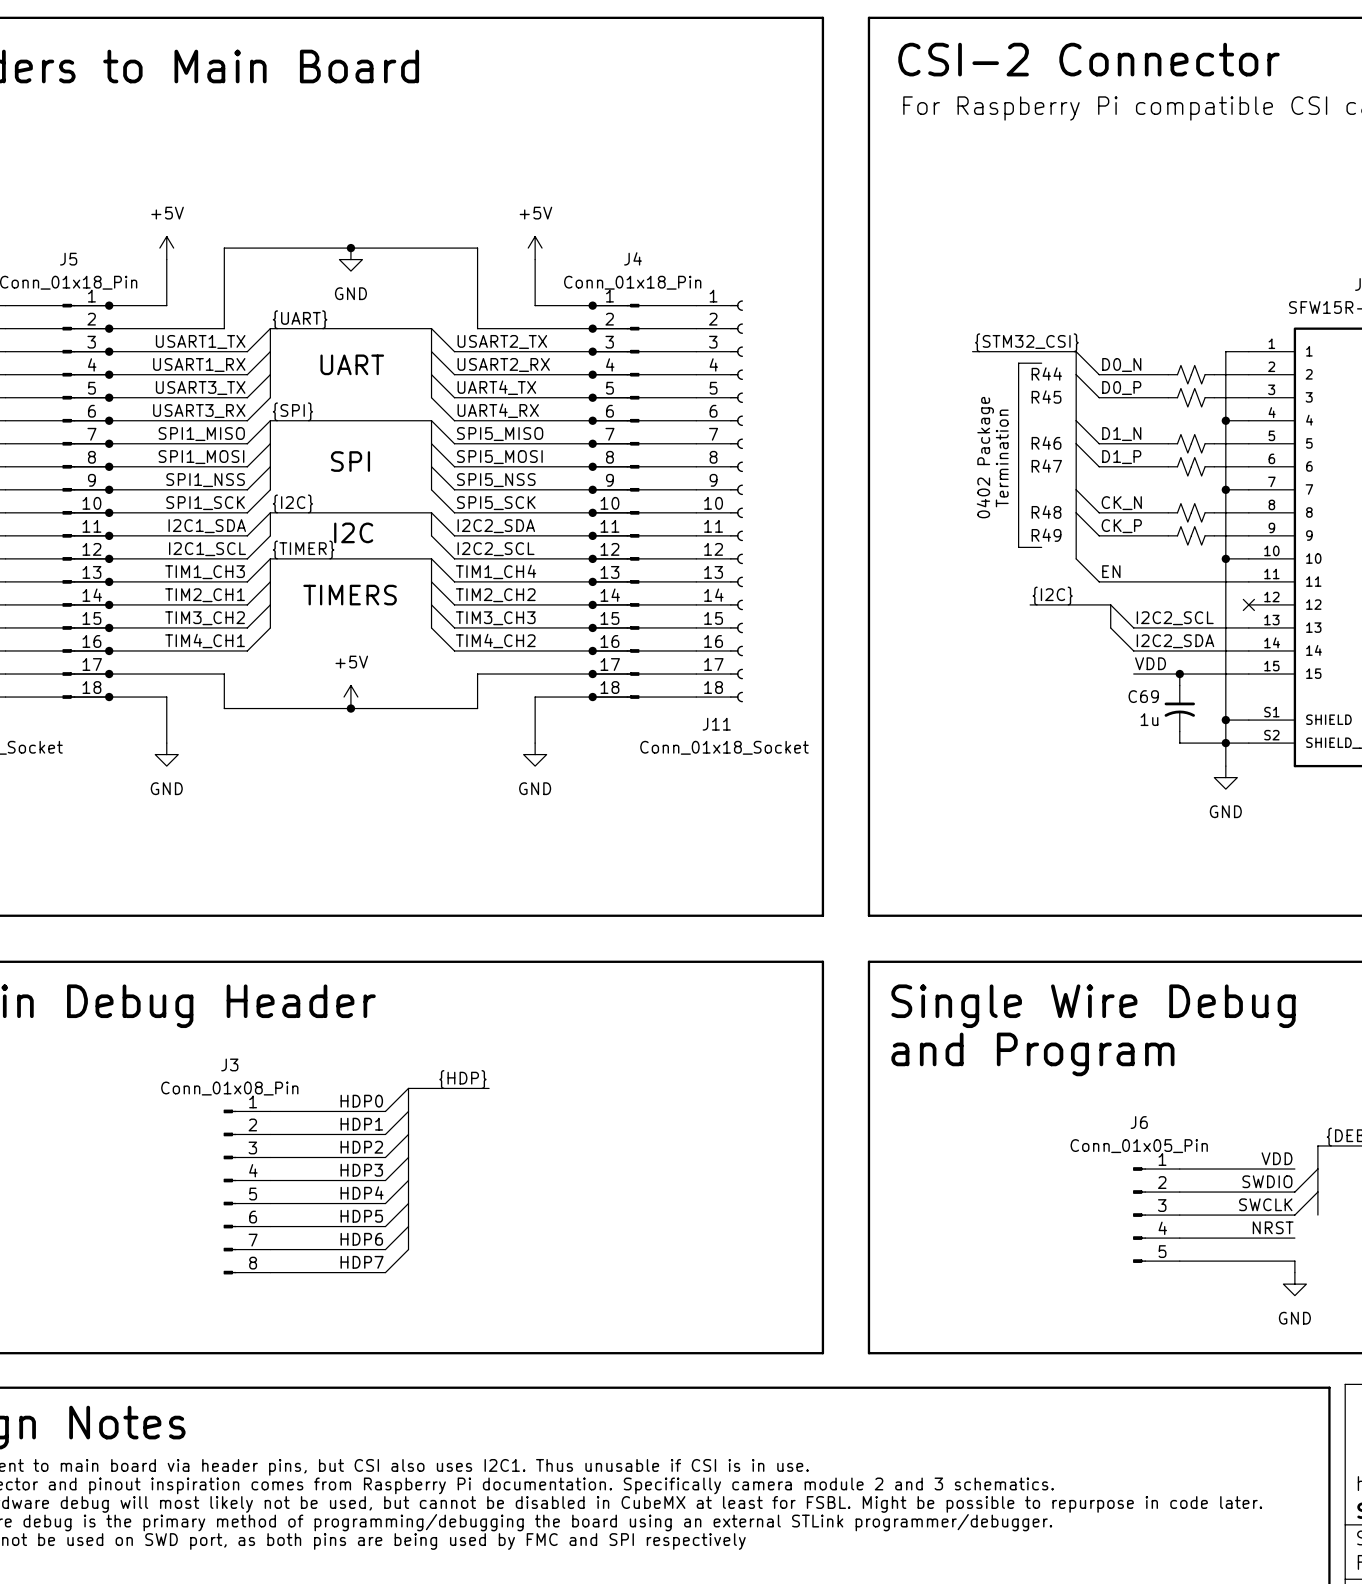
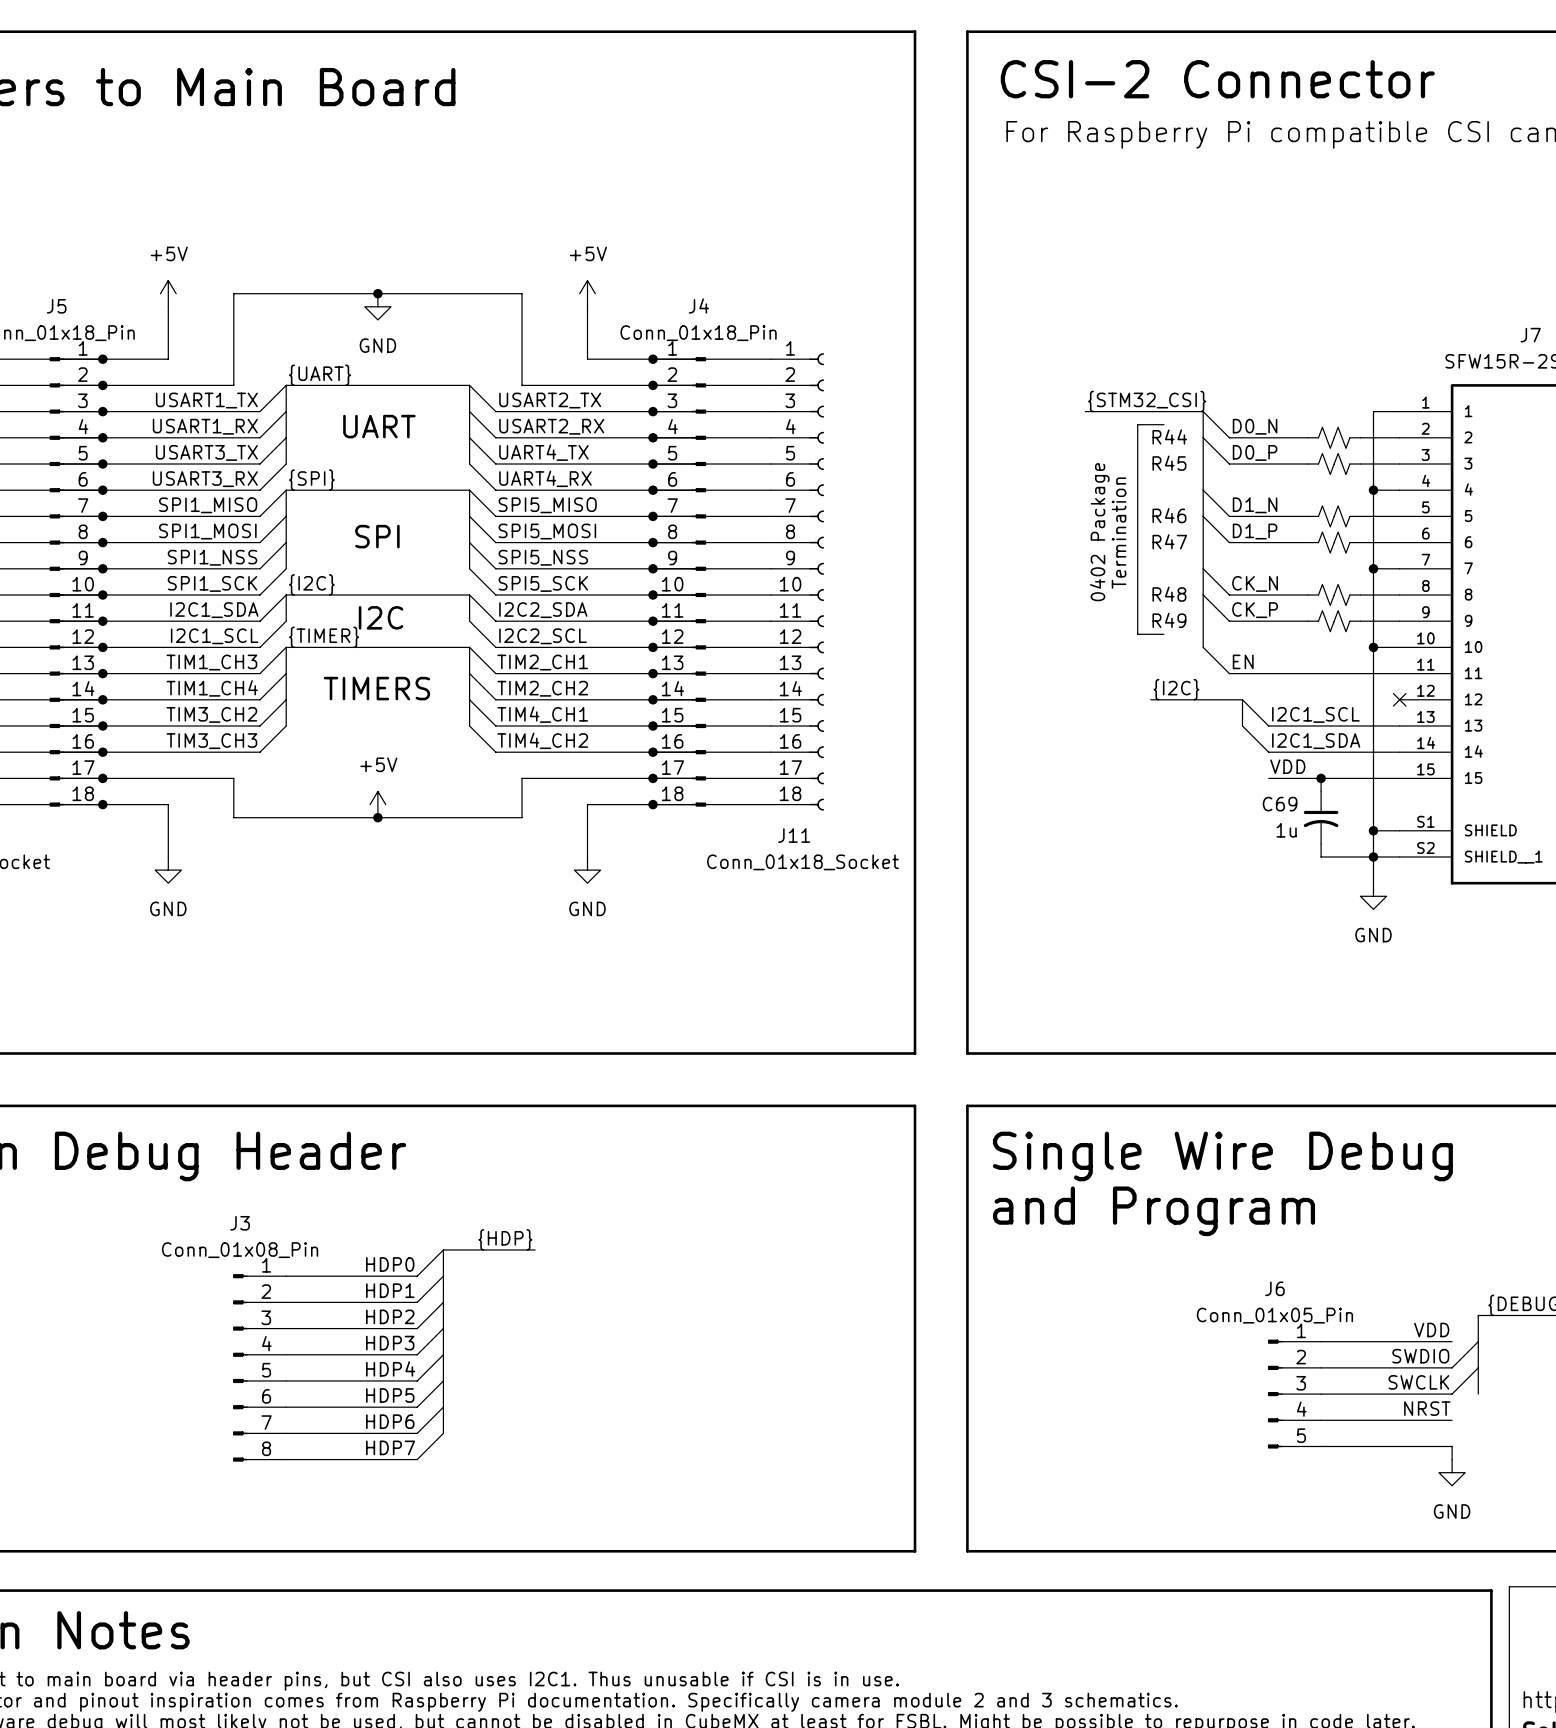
label: TIM1_CH4 (496, 571) -> TIM2_CH1 (542, 662)
label: TIM2_CH1 (205, 595) -> TIM1_CH4 (212, 688)
label: TIM3_CH3 (495, 618) -> TIM4_CH1 (542, 714)
label: I2C2_SCL (1175, 618) -> I2C1_SCL (1315, 714)
label: TIM4_CH1 (205, 640) -> TIM3_CH3 (211, 741)
label: I2C2_SDA (1175, 641) -> I2C1_SDA (1316, 741)

